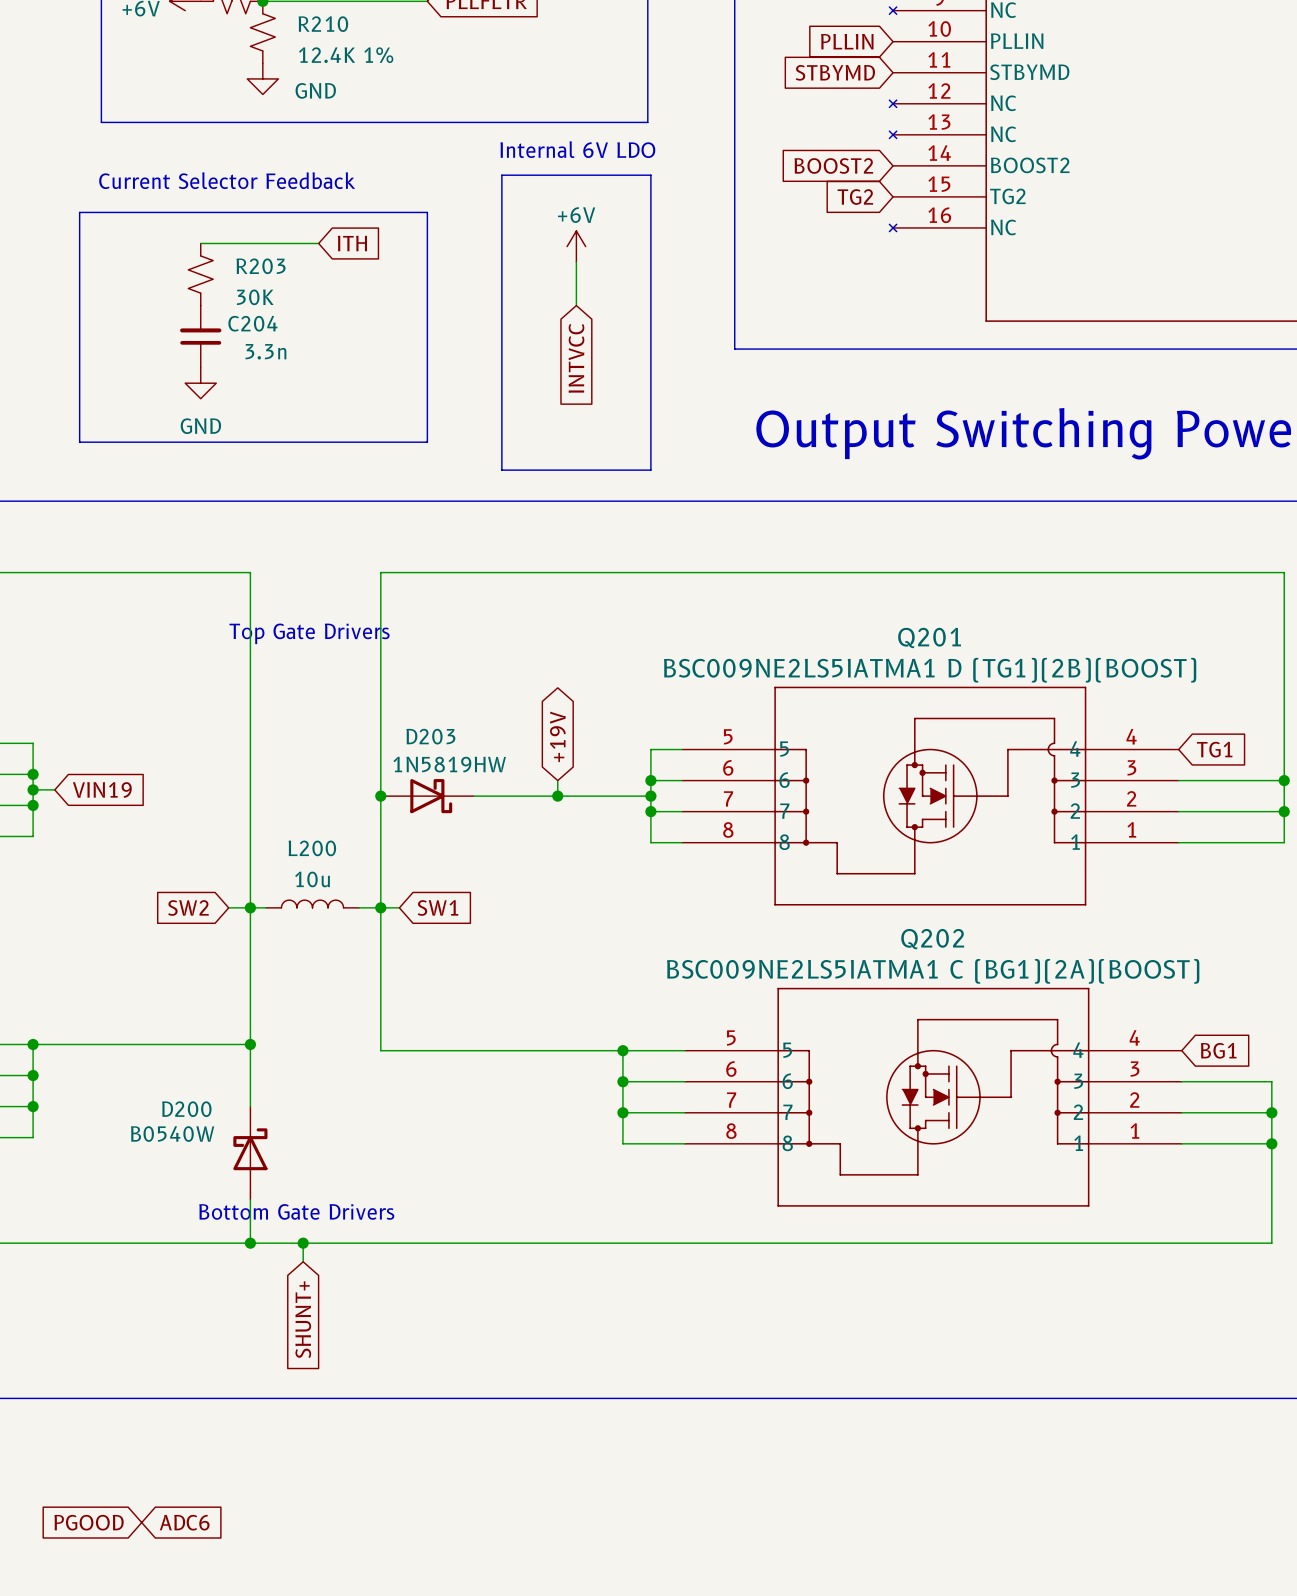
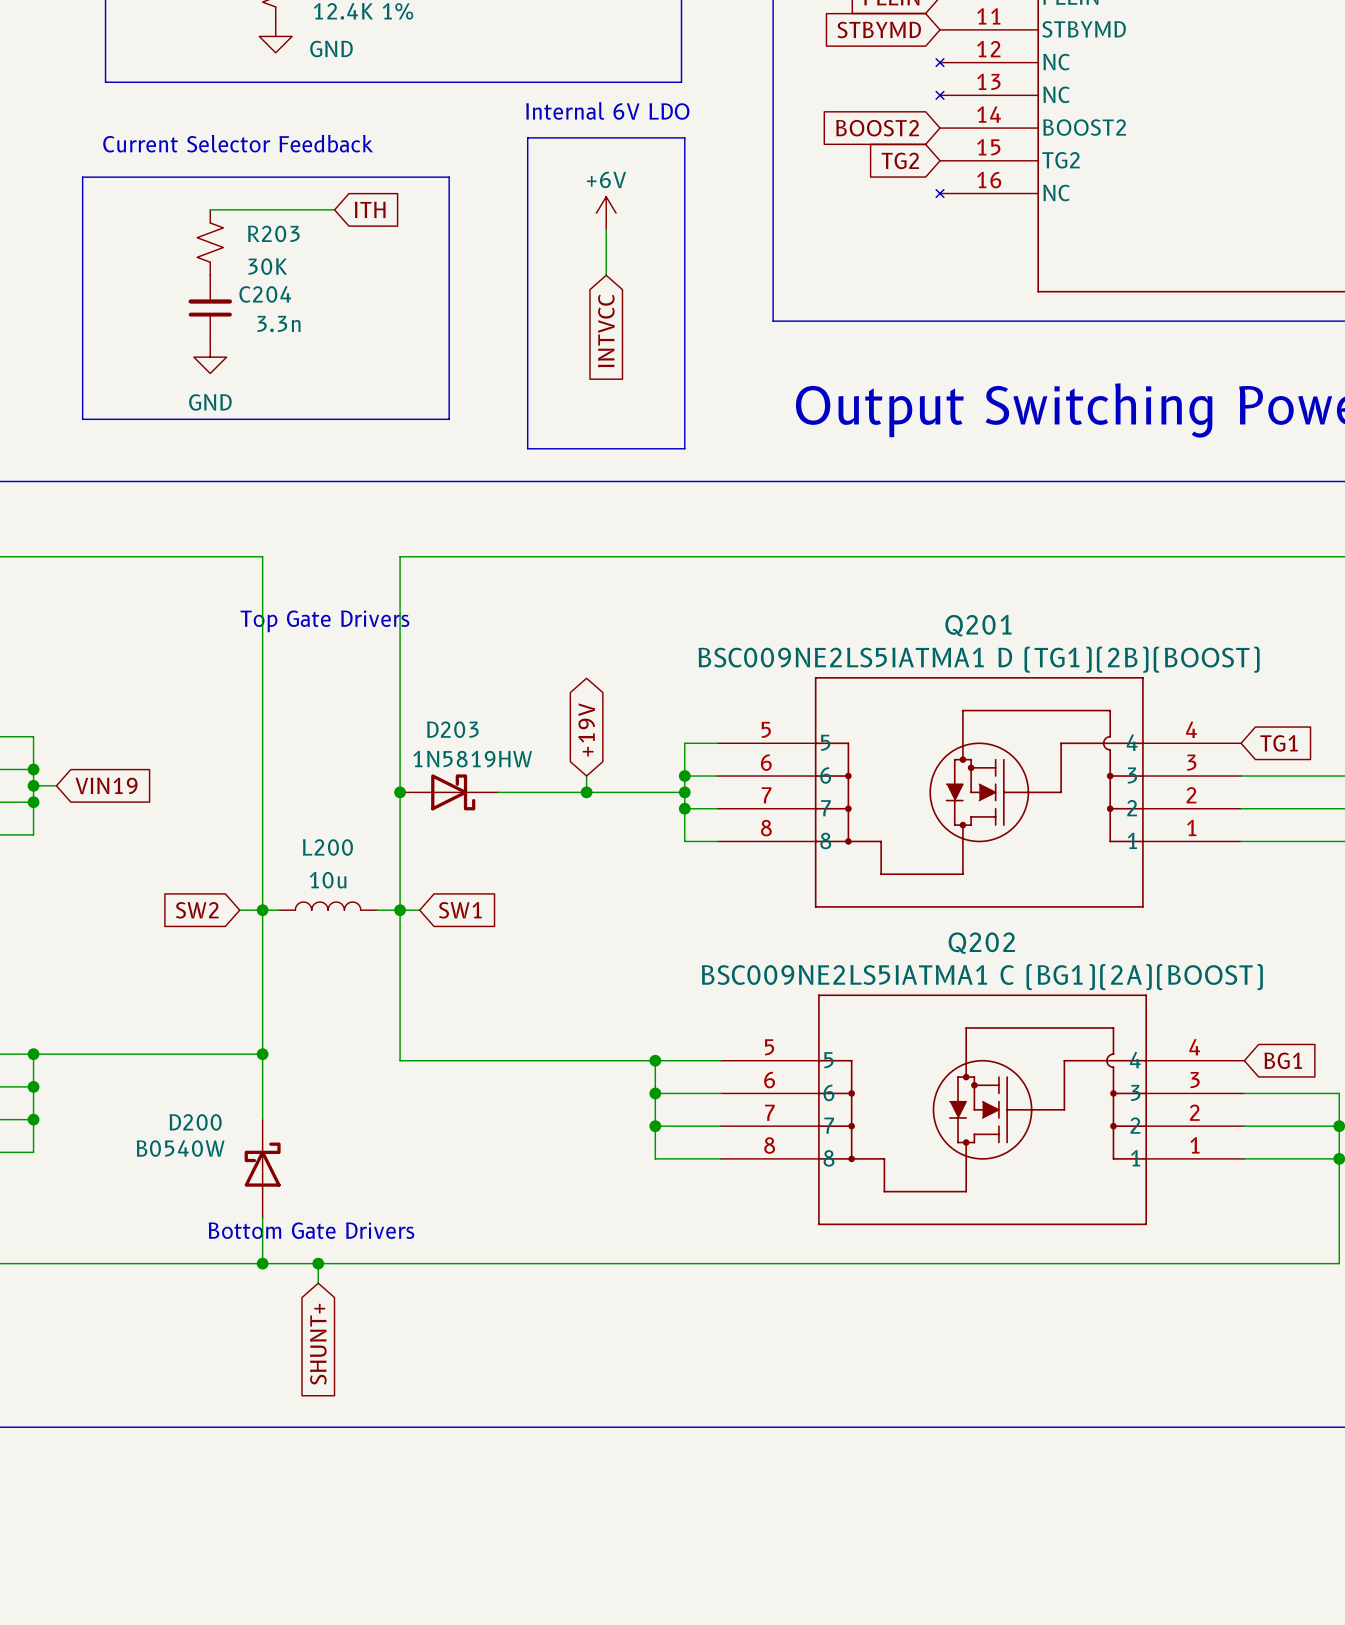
global label: PGOOD (89, 1522) -> none
global label: ADC6 (184, 1522) -> none

